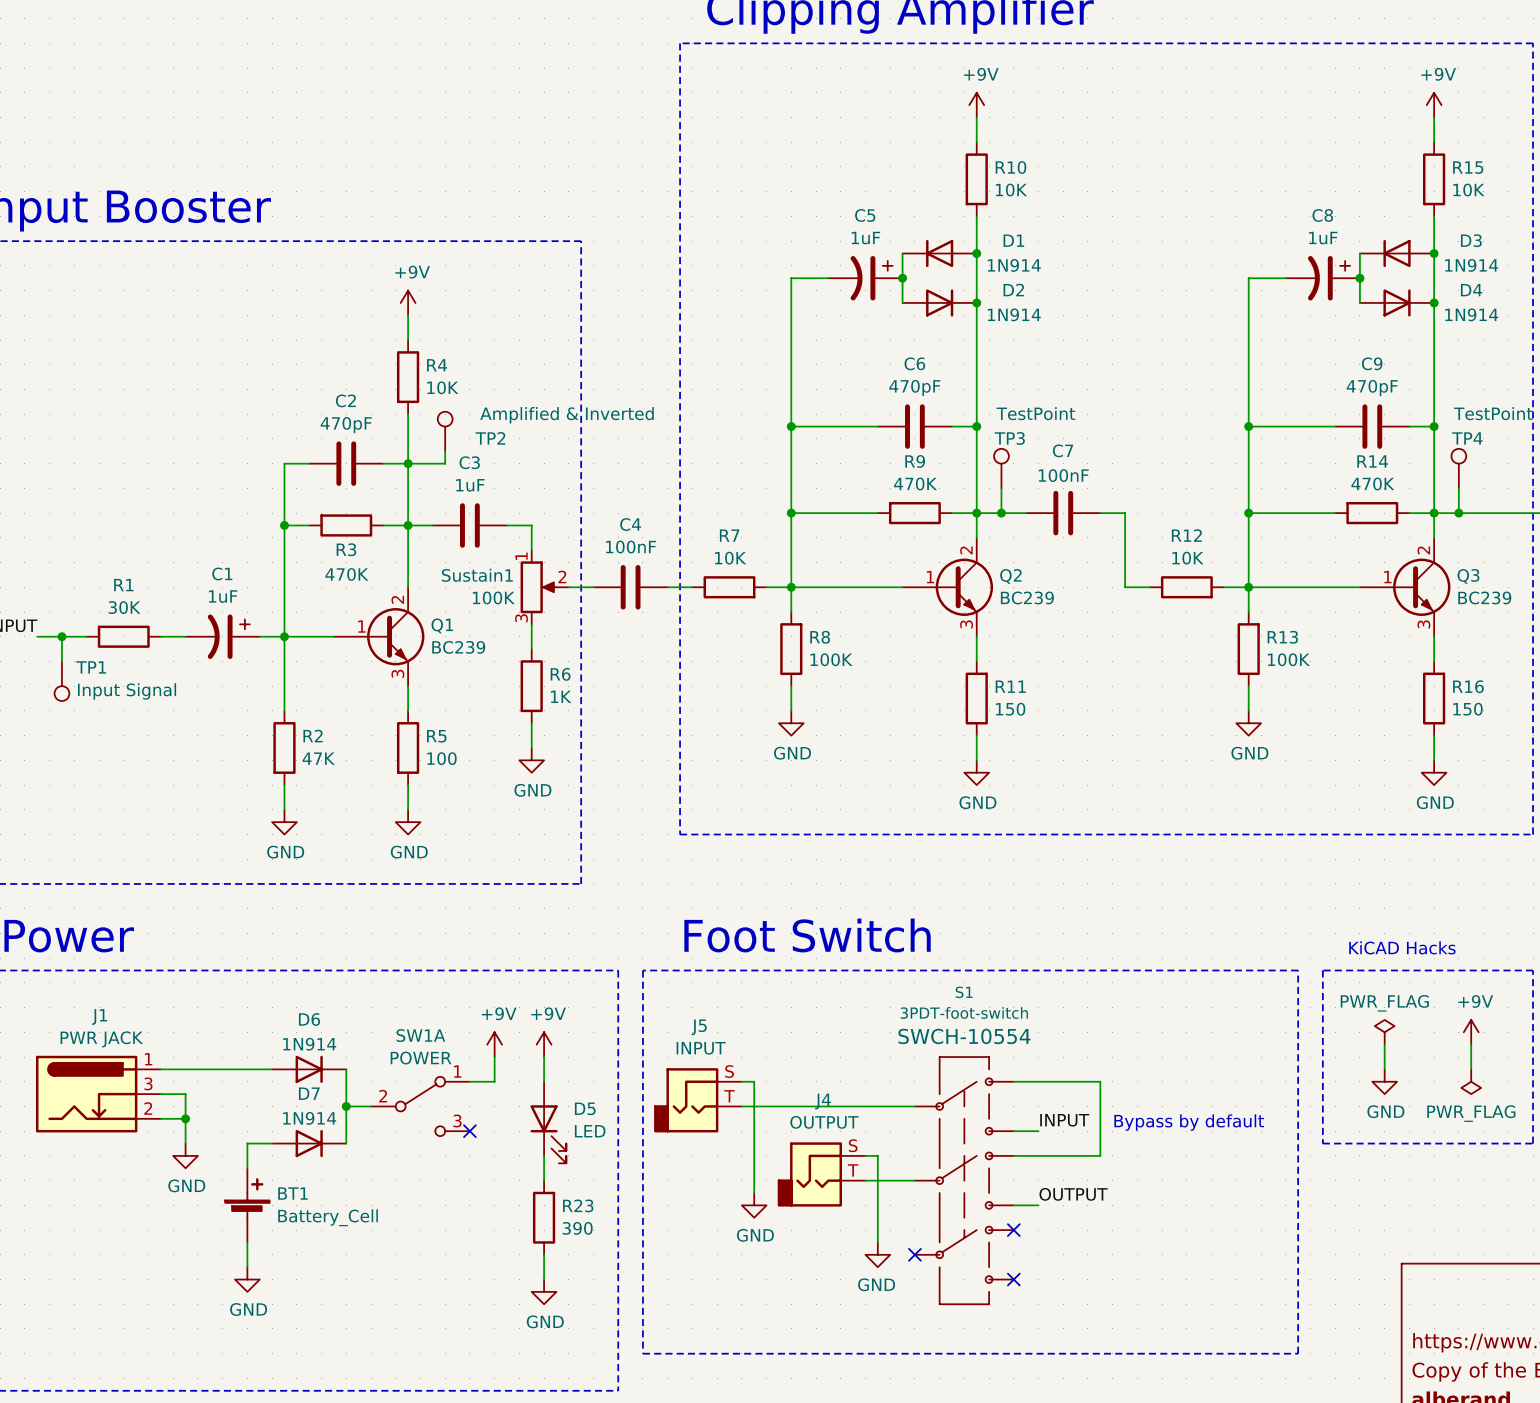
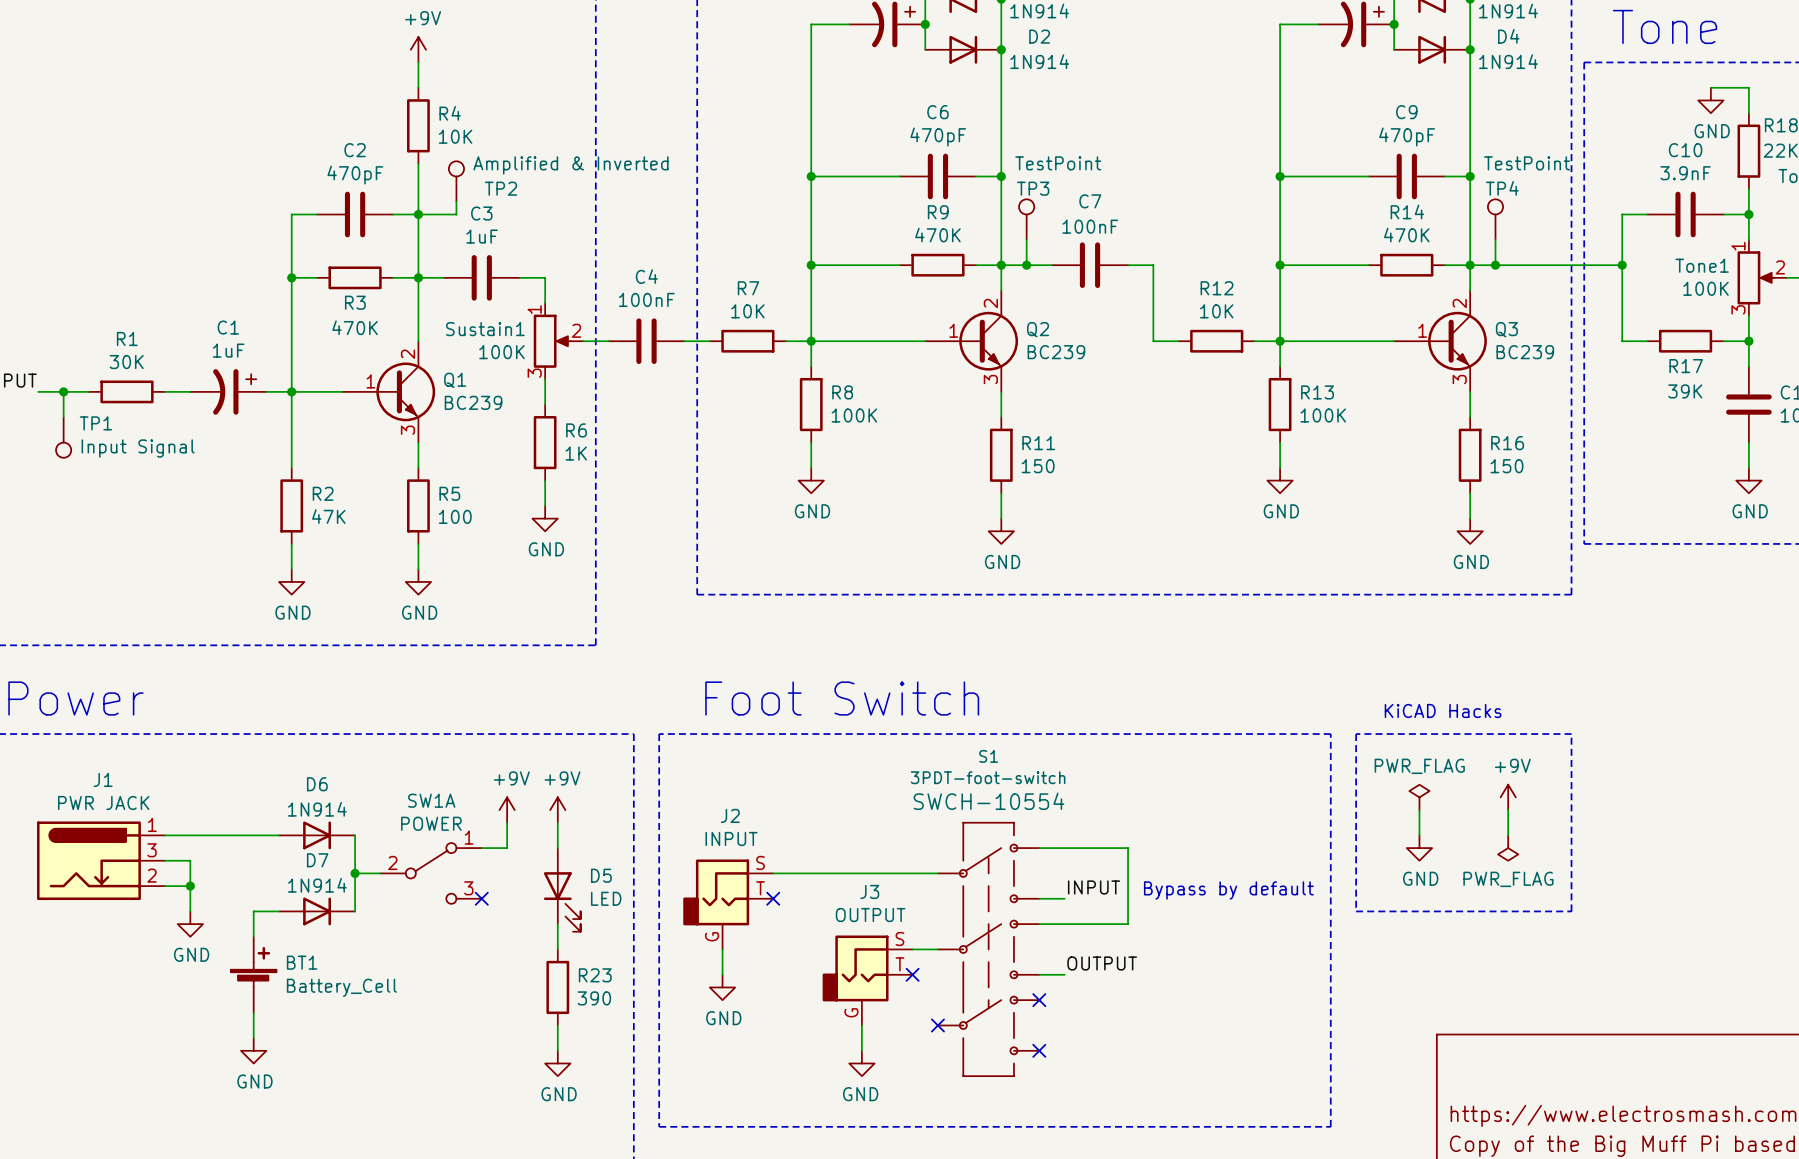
wire: (741, 1081) (754, 1081) (754, 1193) -> none
J5: INPUT (697, 1100) -> none
no-connect mark: none -> (773, 898)
J2: none -> INPUT (728, 904)
wire: (865, 1155) (877, 1155) (877, 1242) -> none
J4: OUTPUT (821, 1174) -> none
wire: none -> (722, 949) (722, 974)
power symbol position: GND (754, 1205) -> GND (722, 987)
no-connect mark: none -> (912, 974)
J3: none -> OUTPUT (867, 980)
wire: none -> (861, 1025) (861, 1050)
power symbol position: GND (877, 1254) -> GND (861, 1063)

